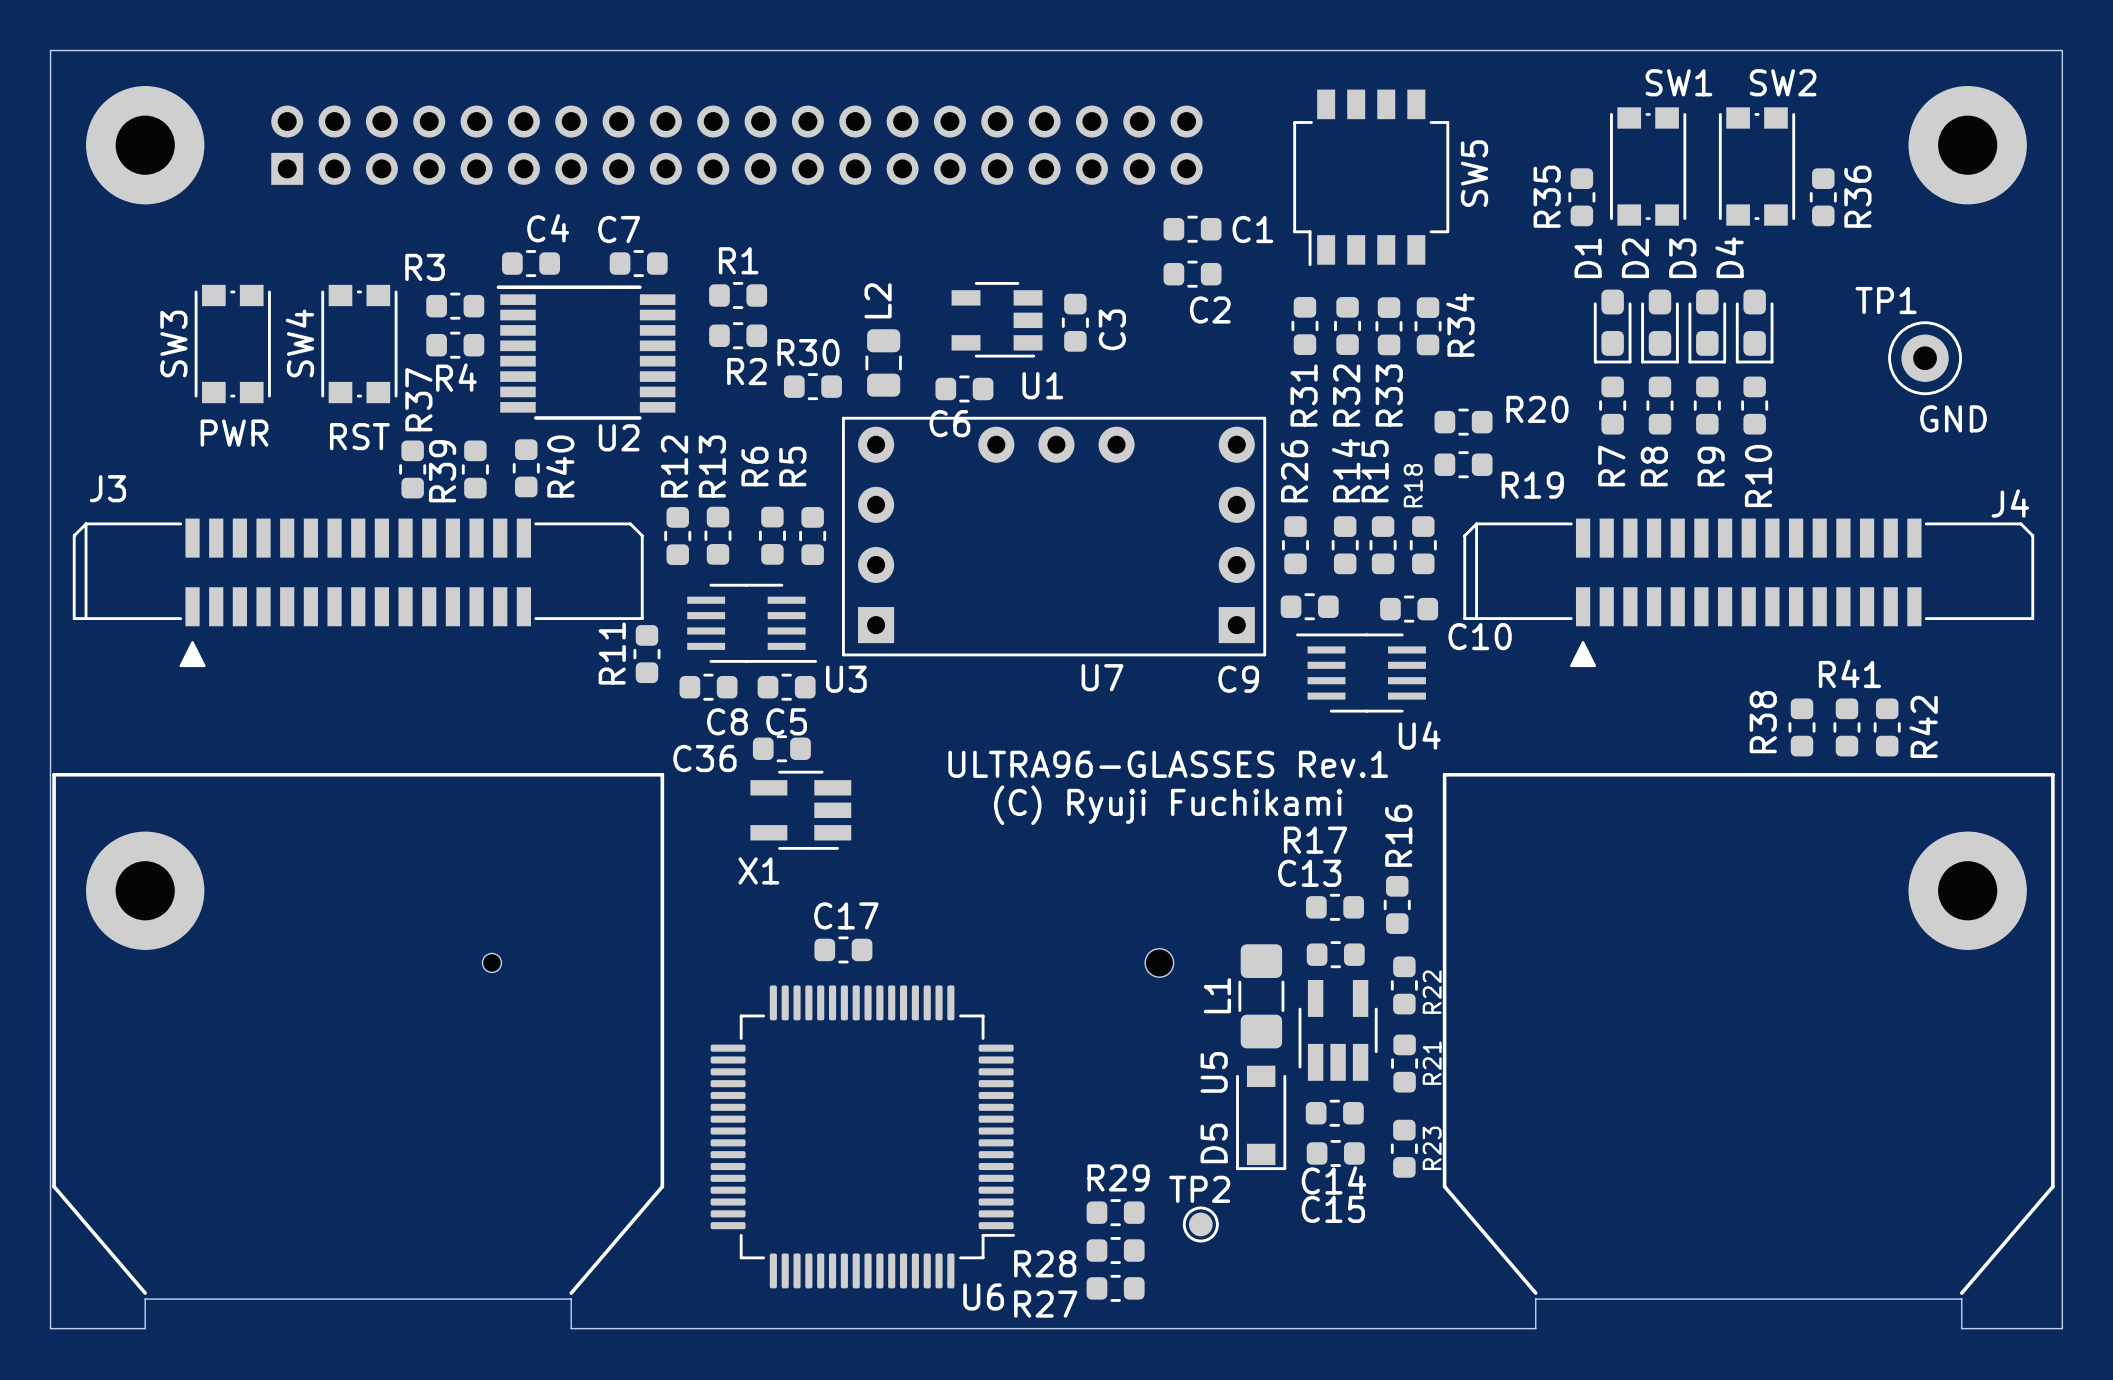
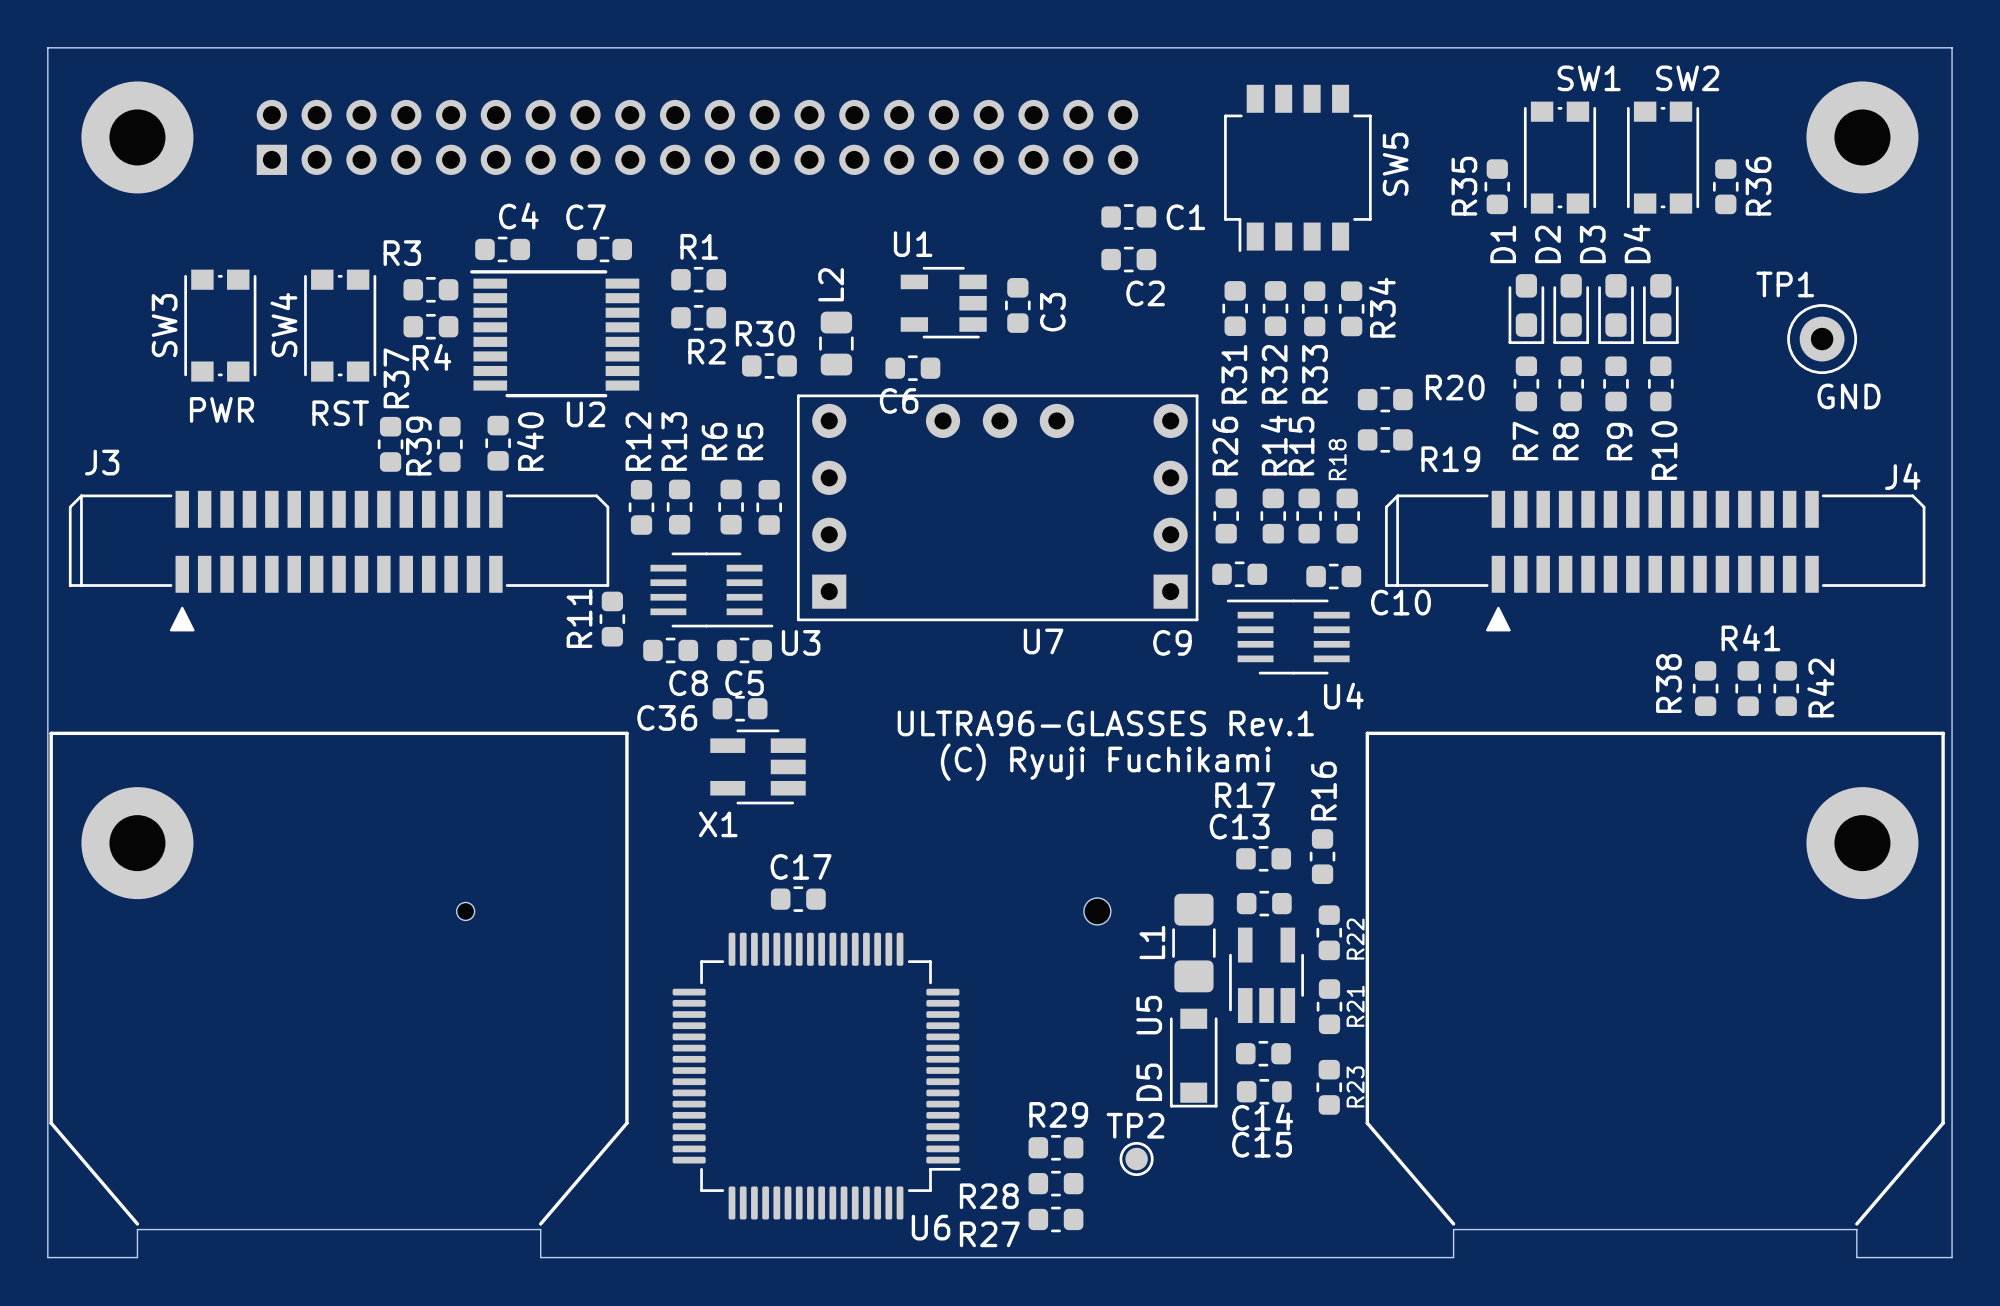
U1 name position: U1 (1042, 385) -> U1 (913, 244)

